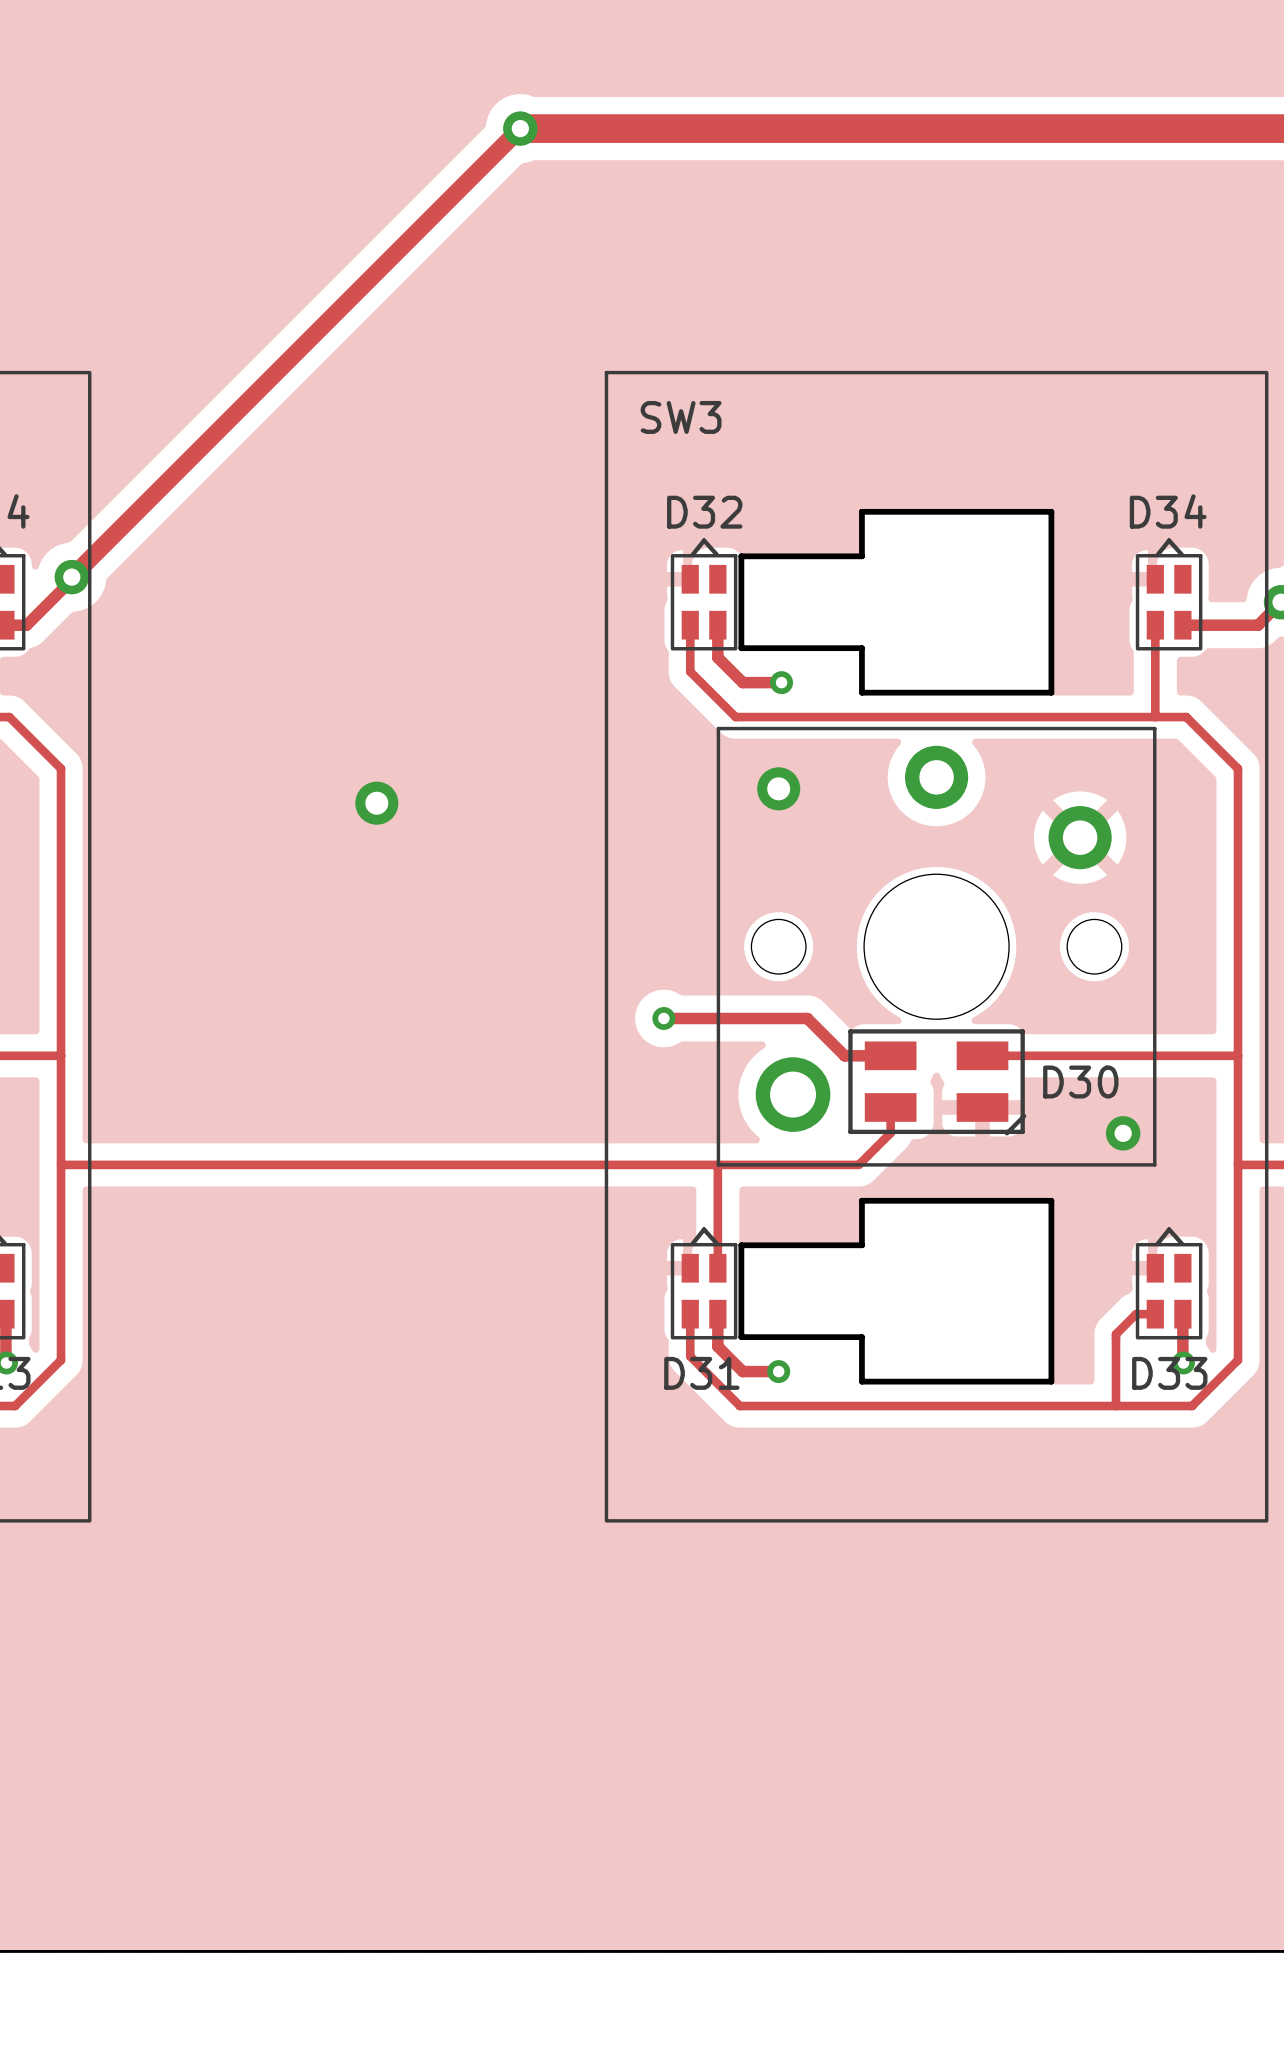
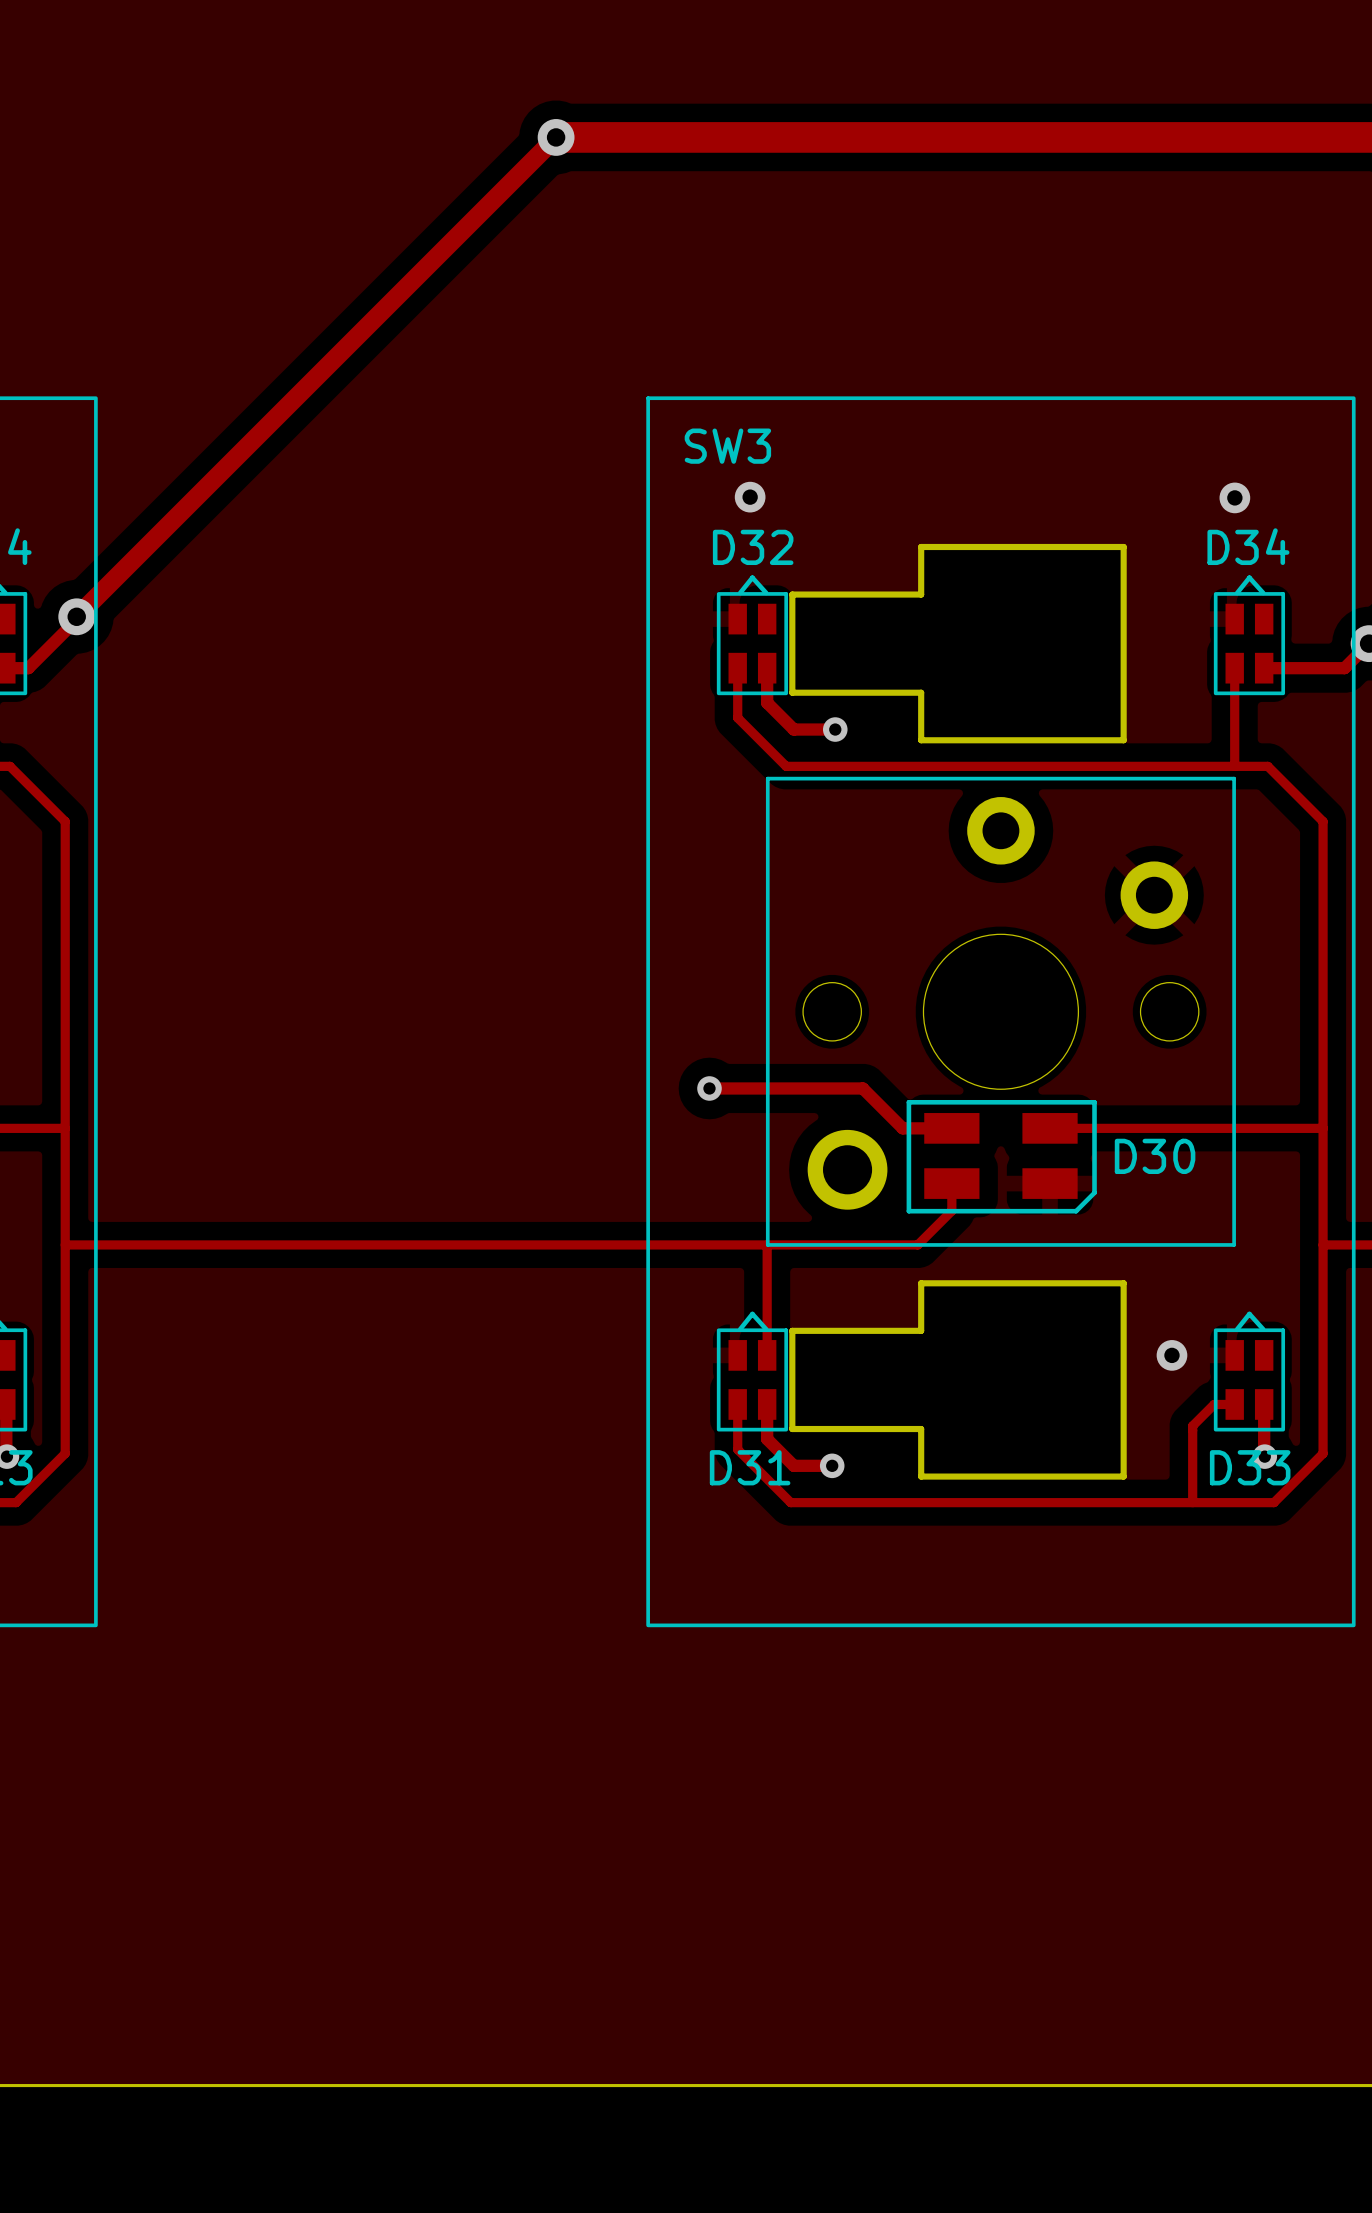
via: none -> (750, 497)
via: none -> (1234, 497)
via: (778, 788) -> none
via: (376, 803) -> none
D30 footprint: [848, 1029, 1027, 1136] -> [906, 1099, 1097, 1214]
via: (1123, 1133) -> none
via: none -> (1171, 1355)

